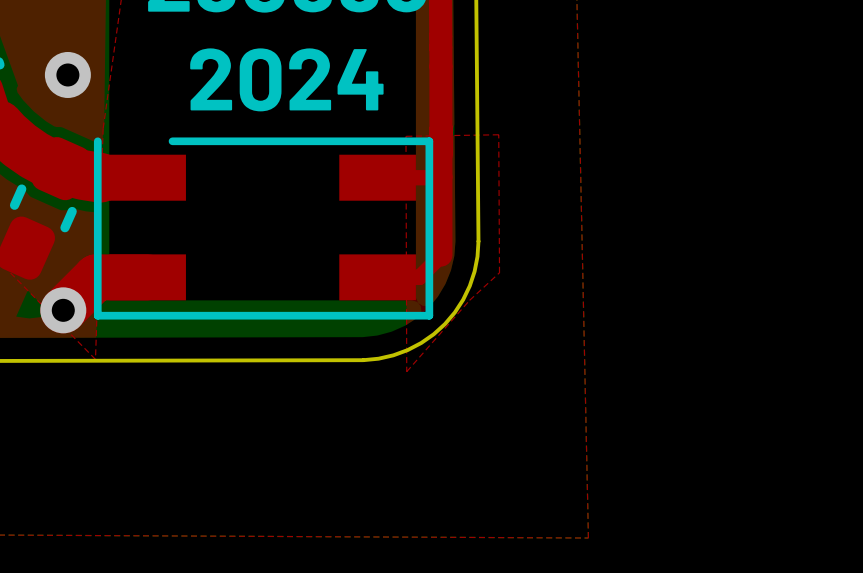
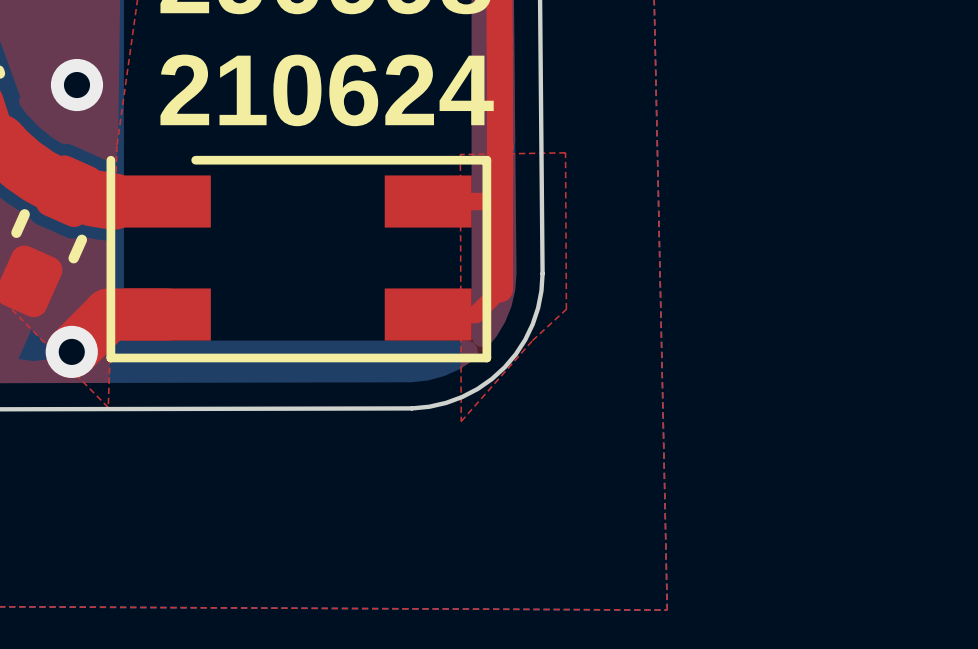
text: 2024 (286, 79) -> 210624 (327, 90)

